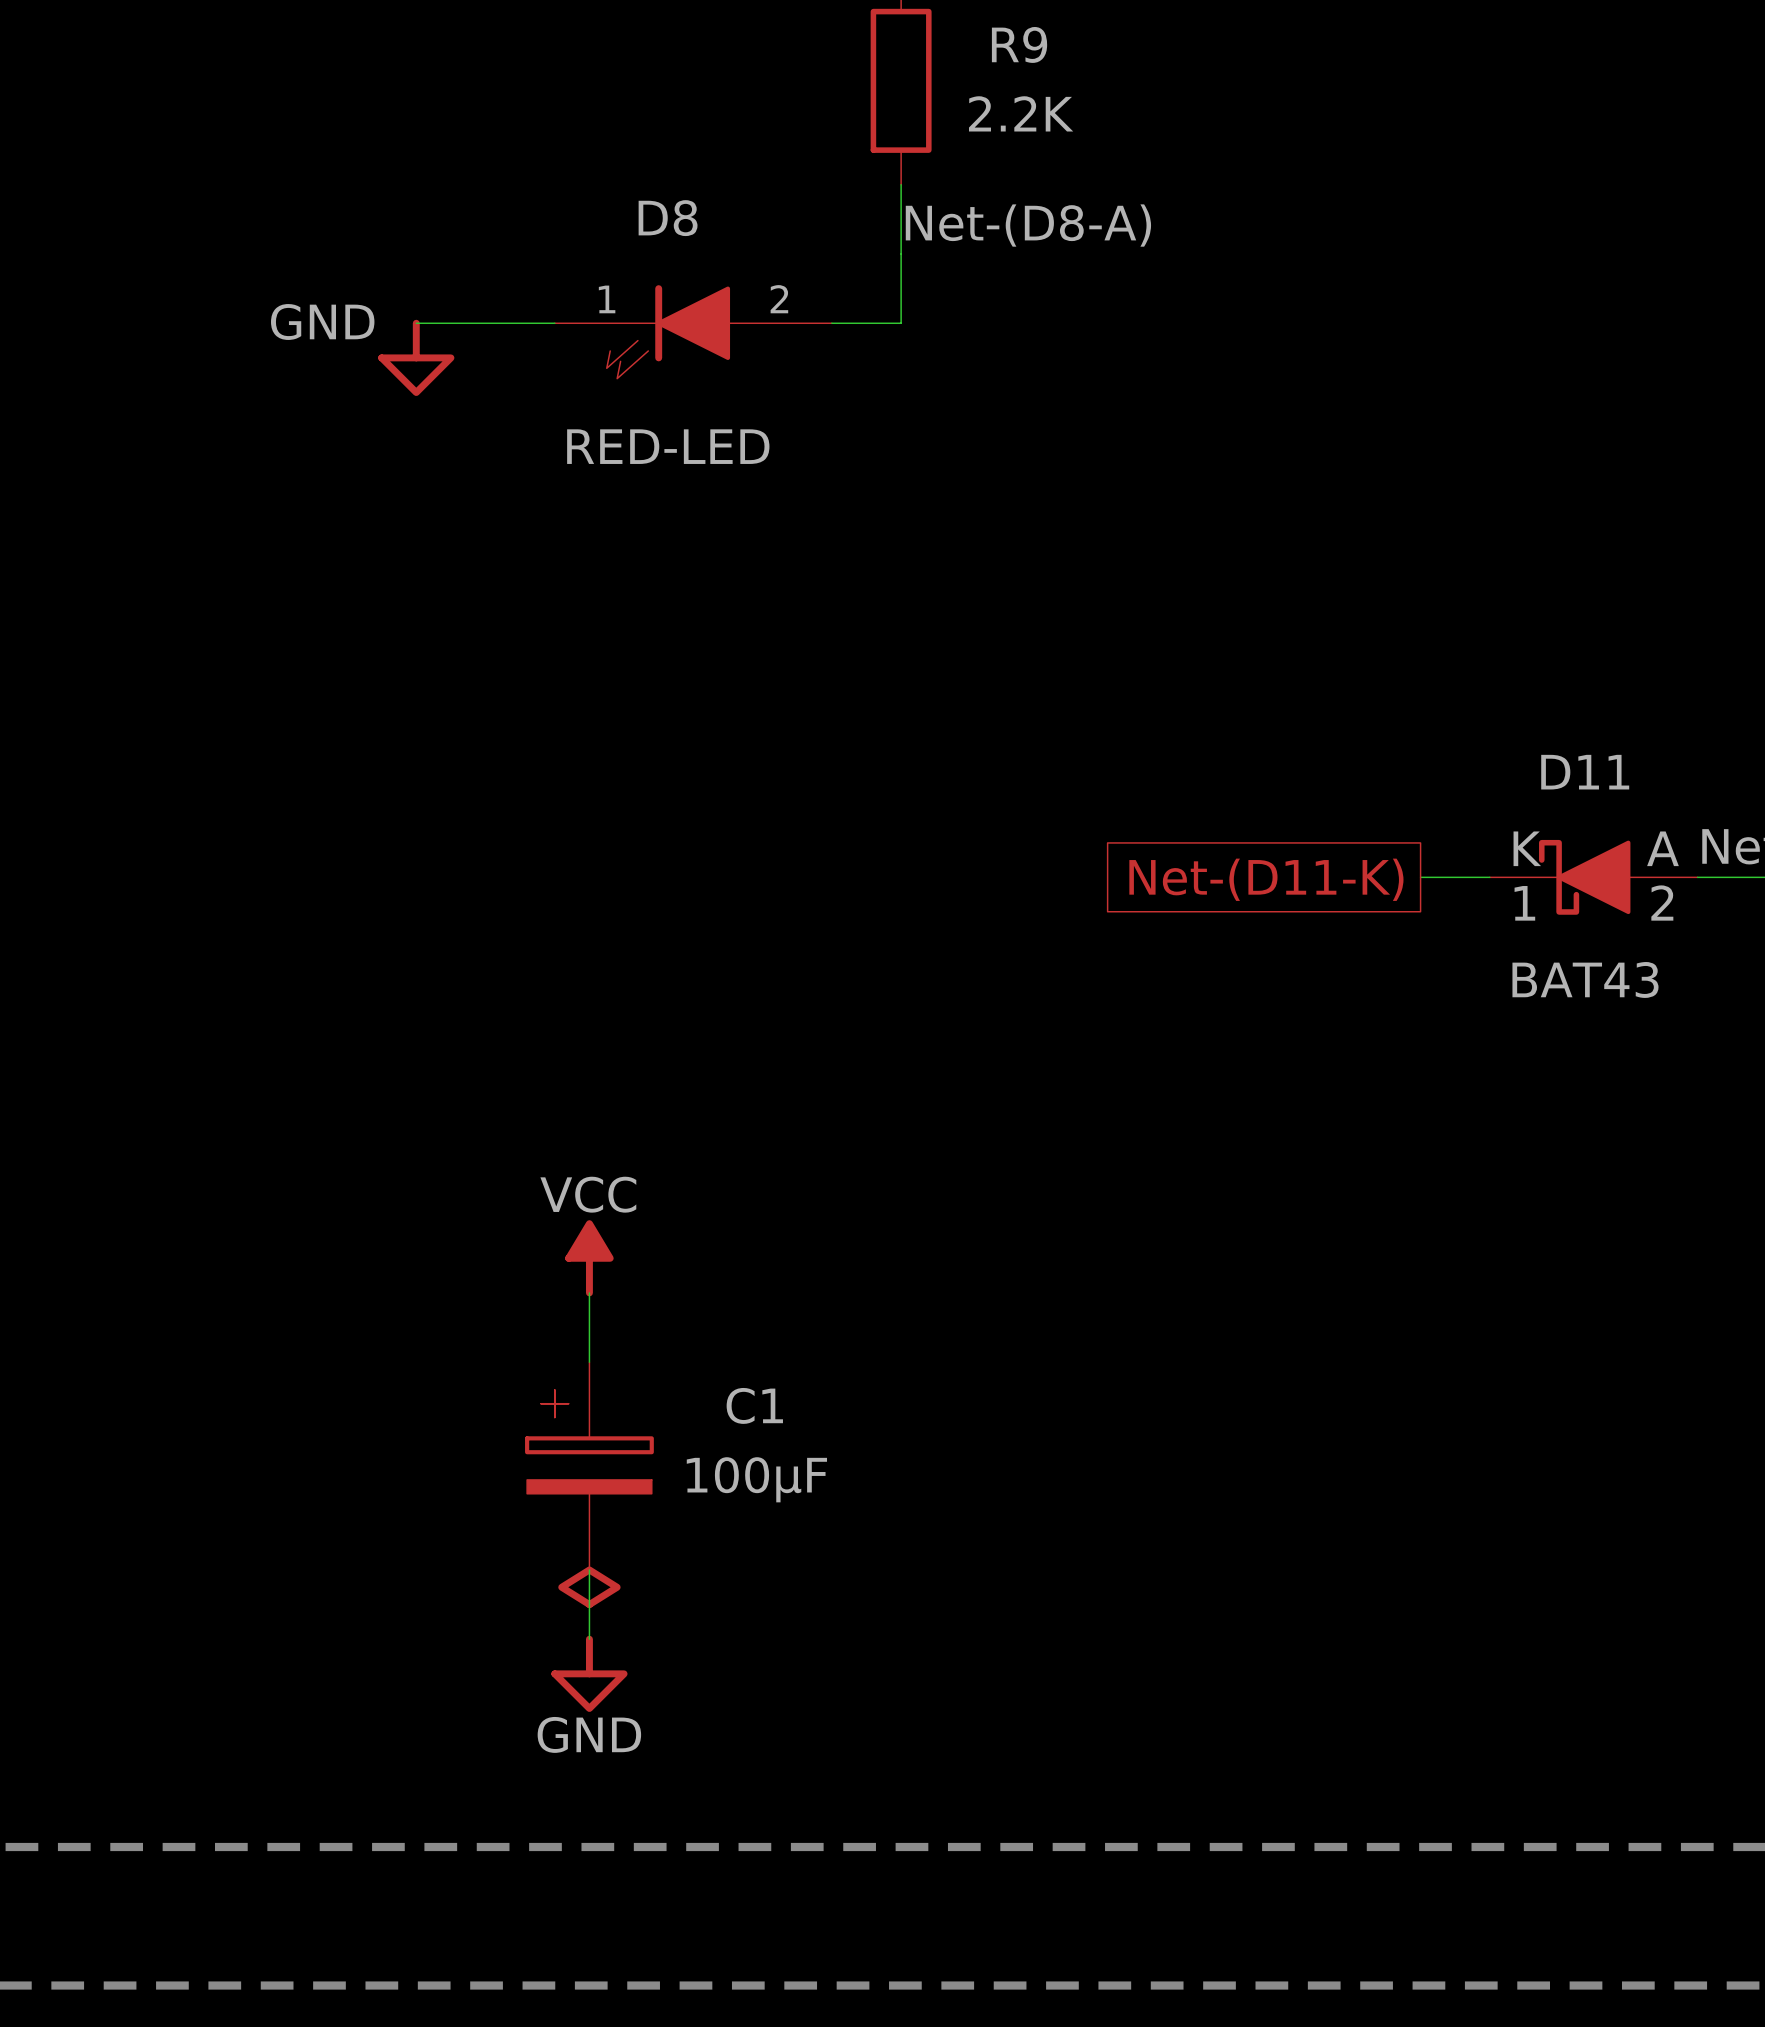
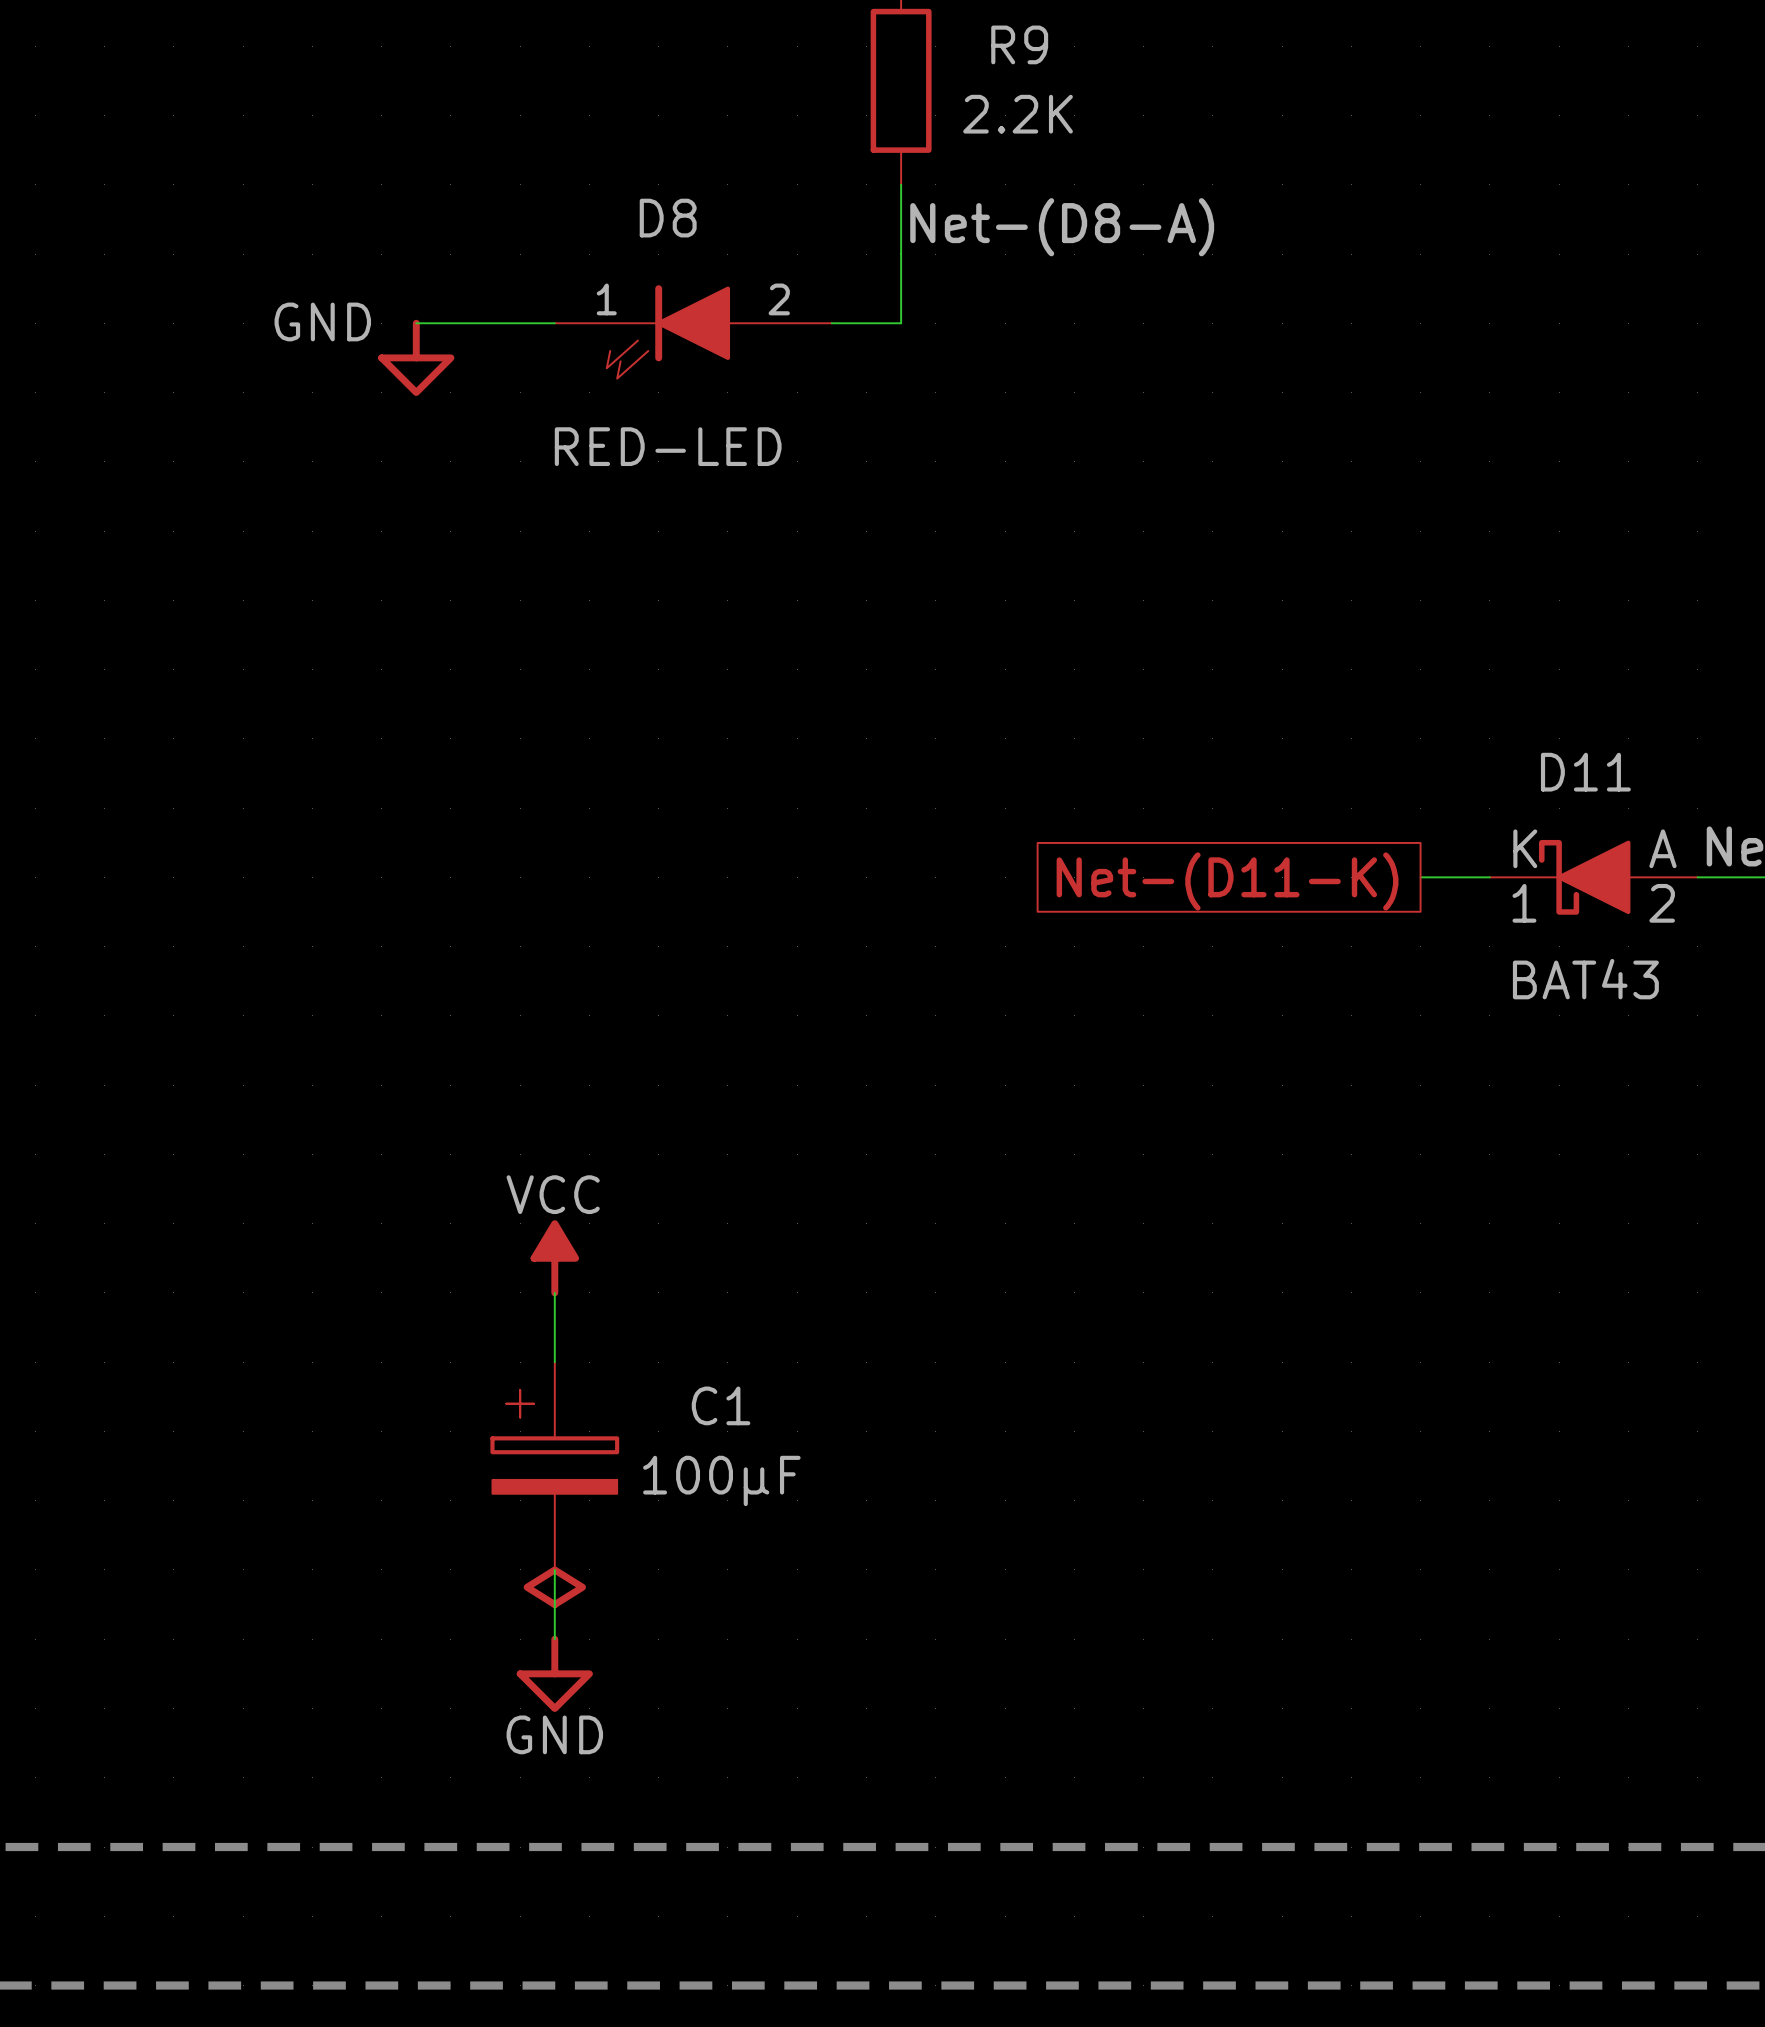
power symbol position: VCC (589, 1258) -> VCC (554, 1258)
wire: (589, 1292) (589, 1362) -> (554, 1292) (554, 1362)
C1 position: (589, 1466) -> (554, 1466)
wire: (589, 1569) (589, 1639) -> (554, 1569) (554, 1639)
power symbol position: (589, 1587) -> (554, 1587)
power symbol position: GND (589, 1673) -> GND (554, 1673)

